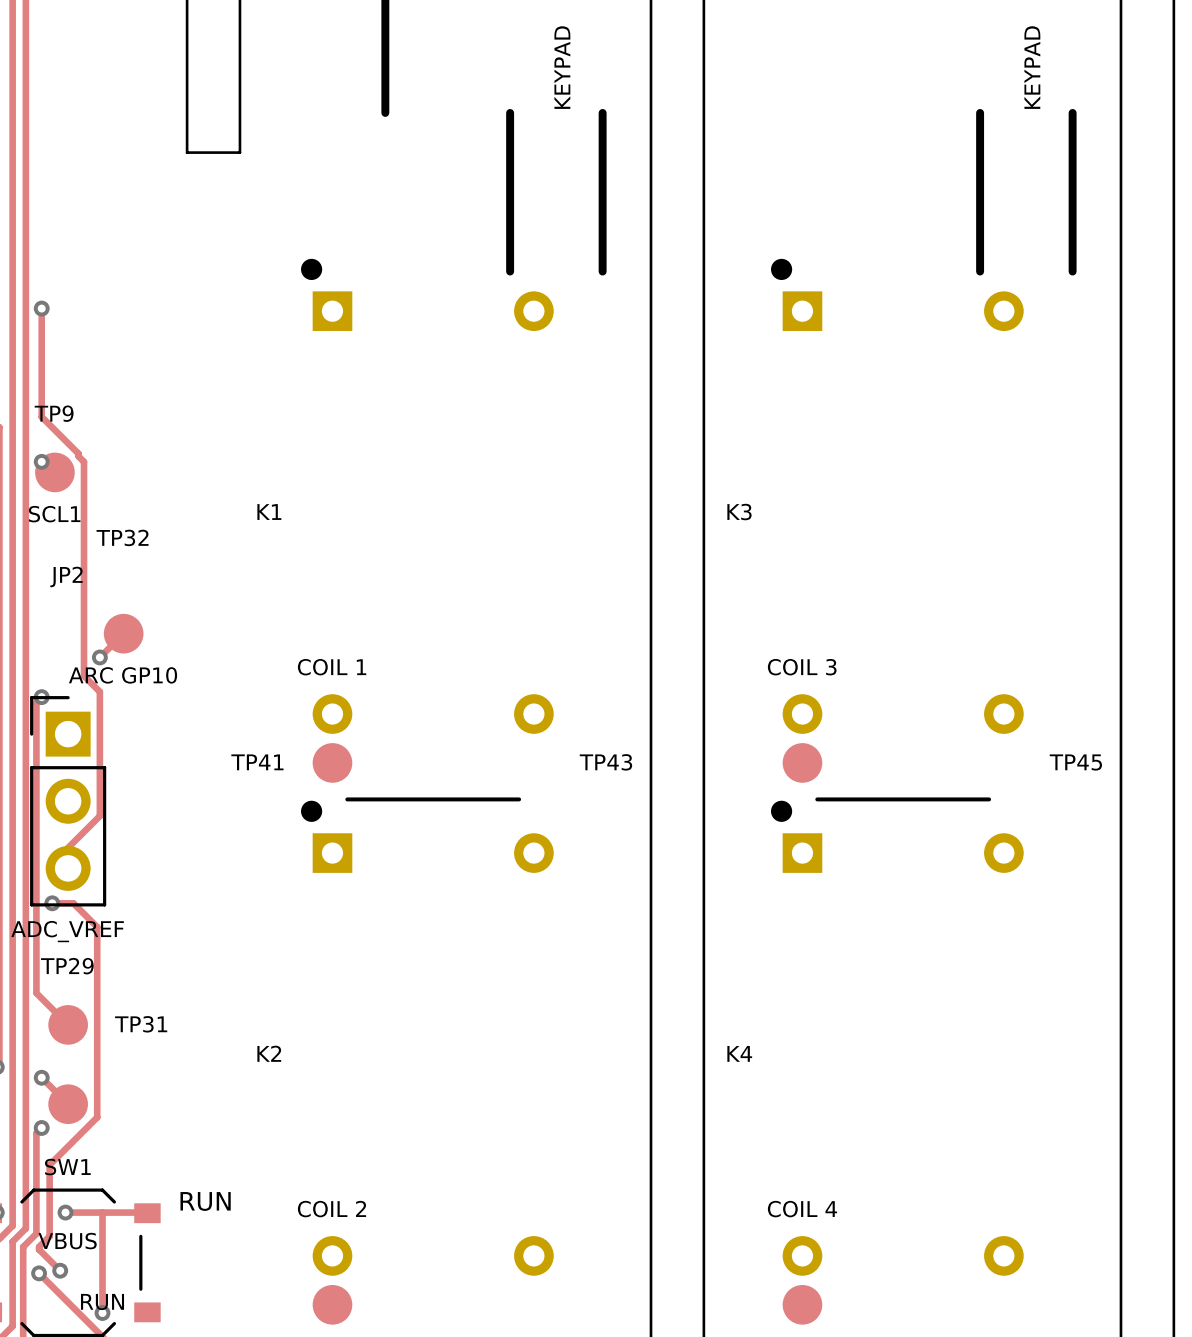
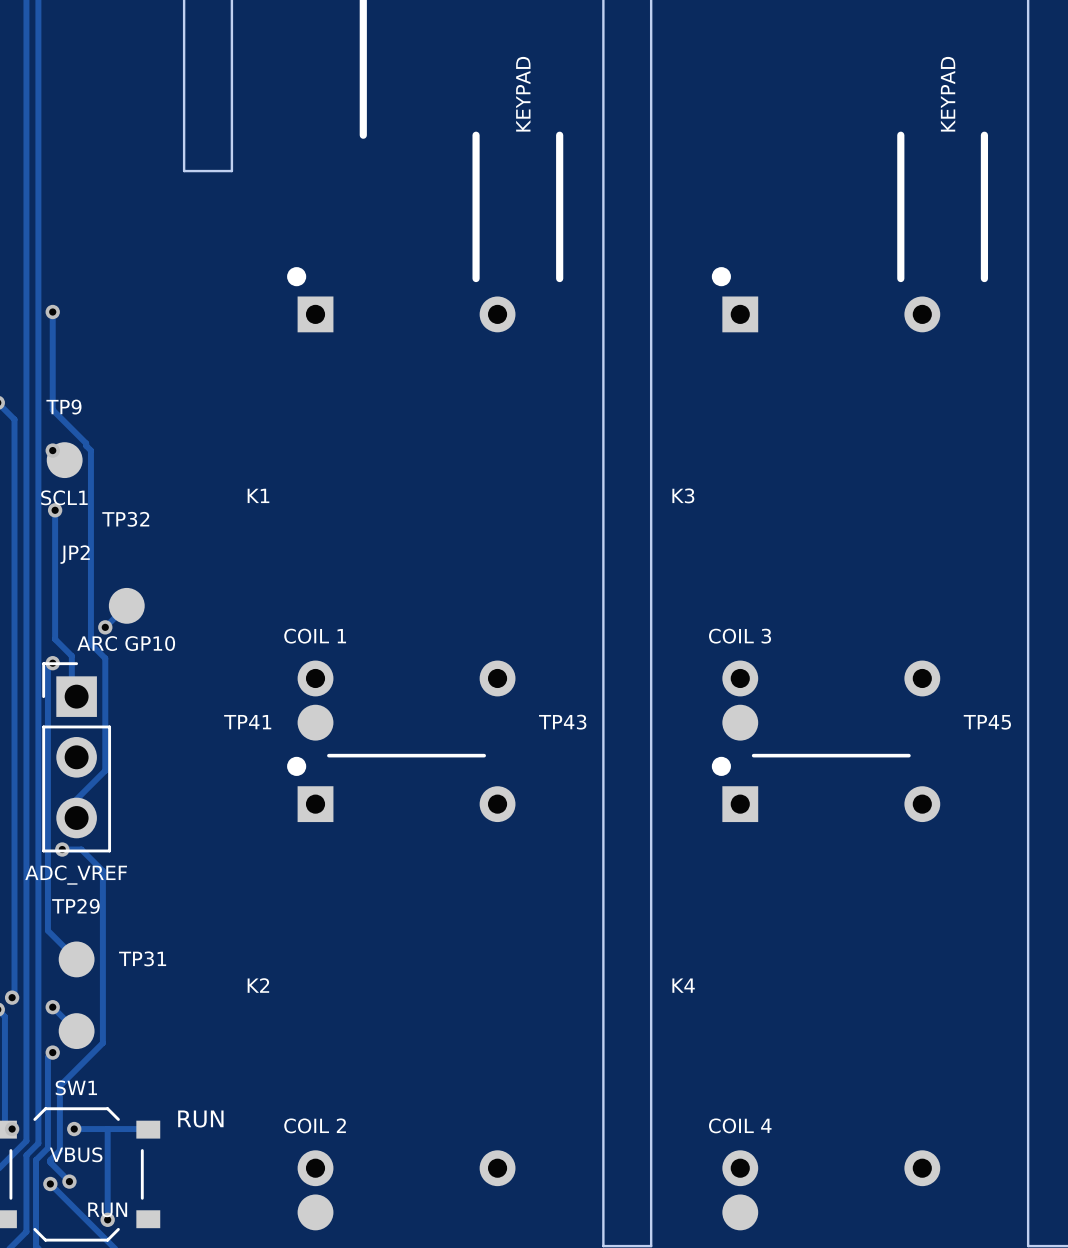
track: none -> (55, 510) (55, 639) (71, 656) (71, 691)
via: none -> (55, 510)

